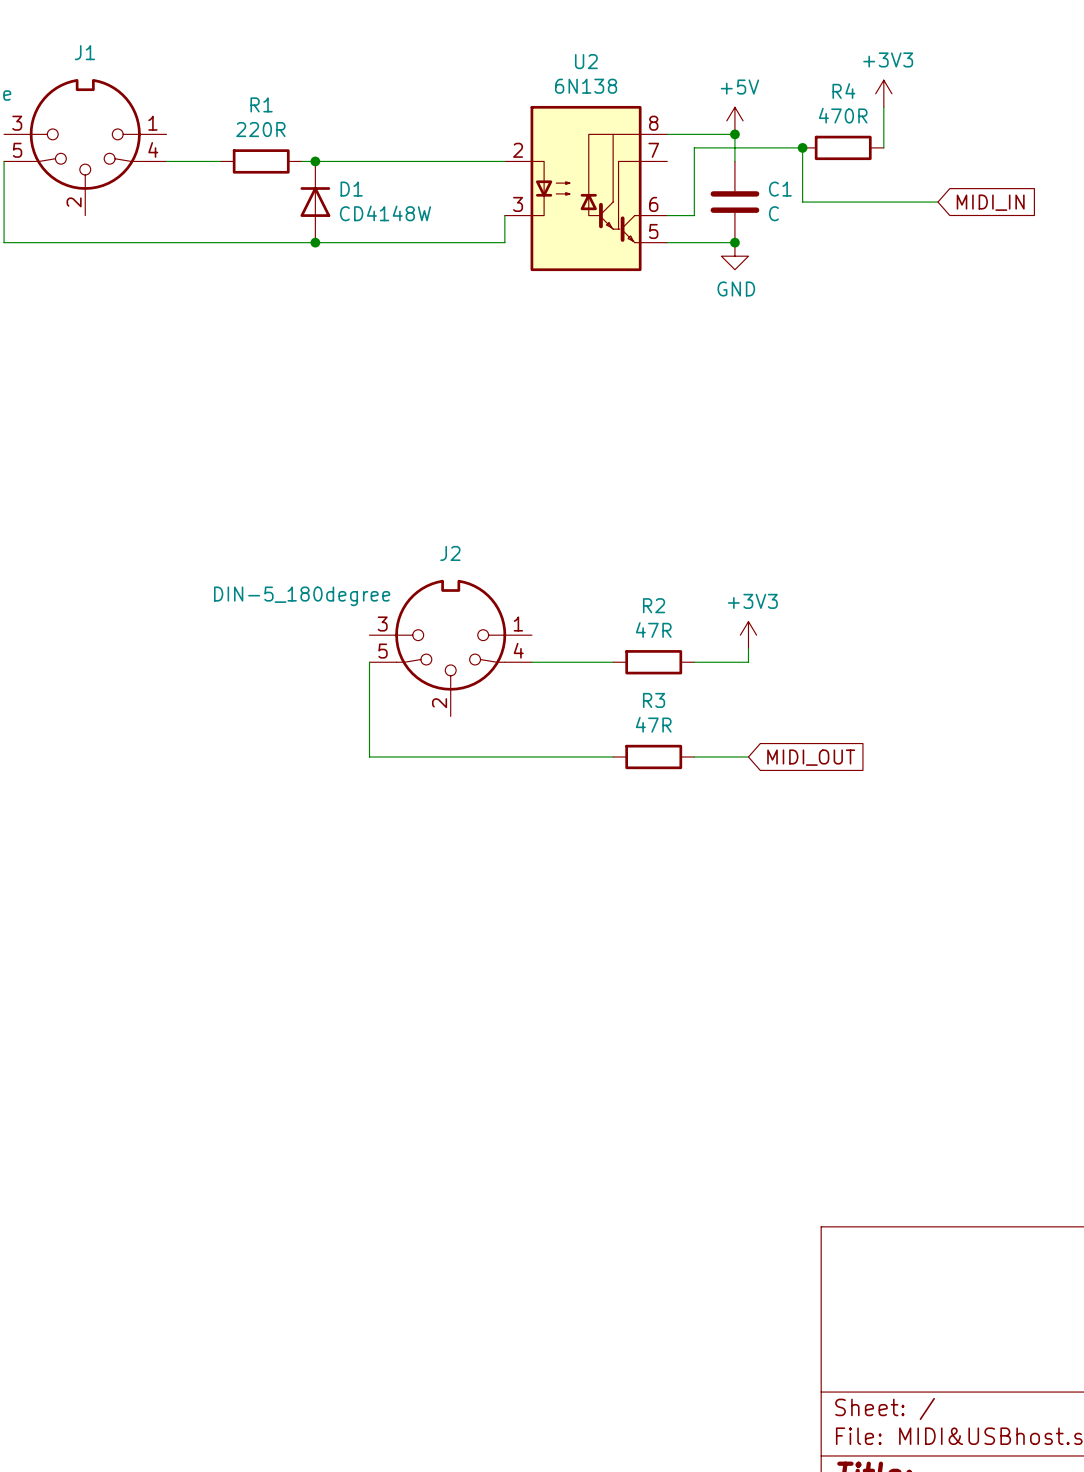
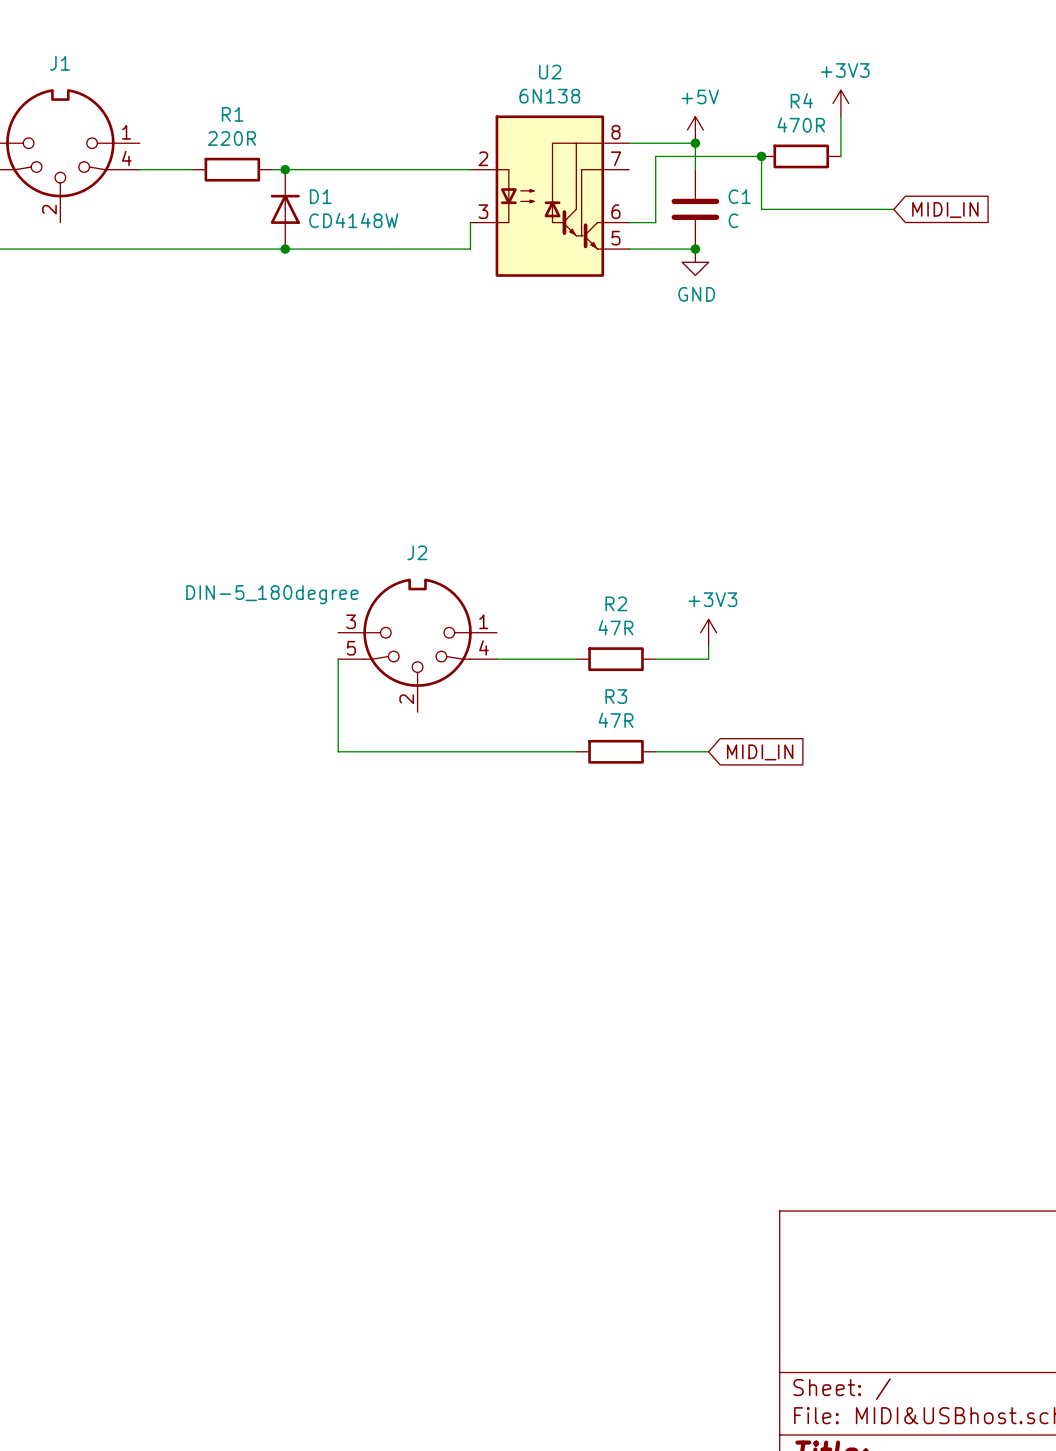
global label: MIDI_OUT (811, 757) -> MIDI_IN (760, 752)

